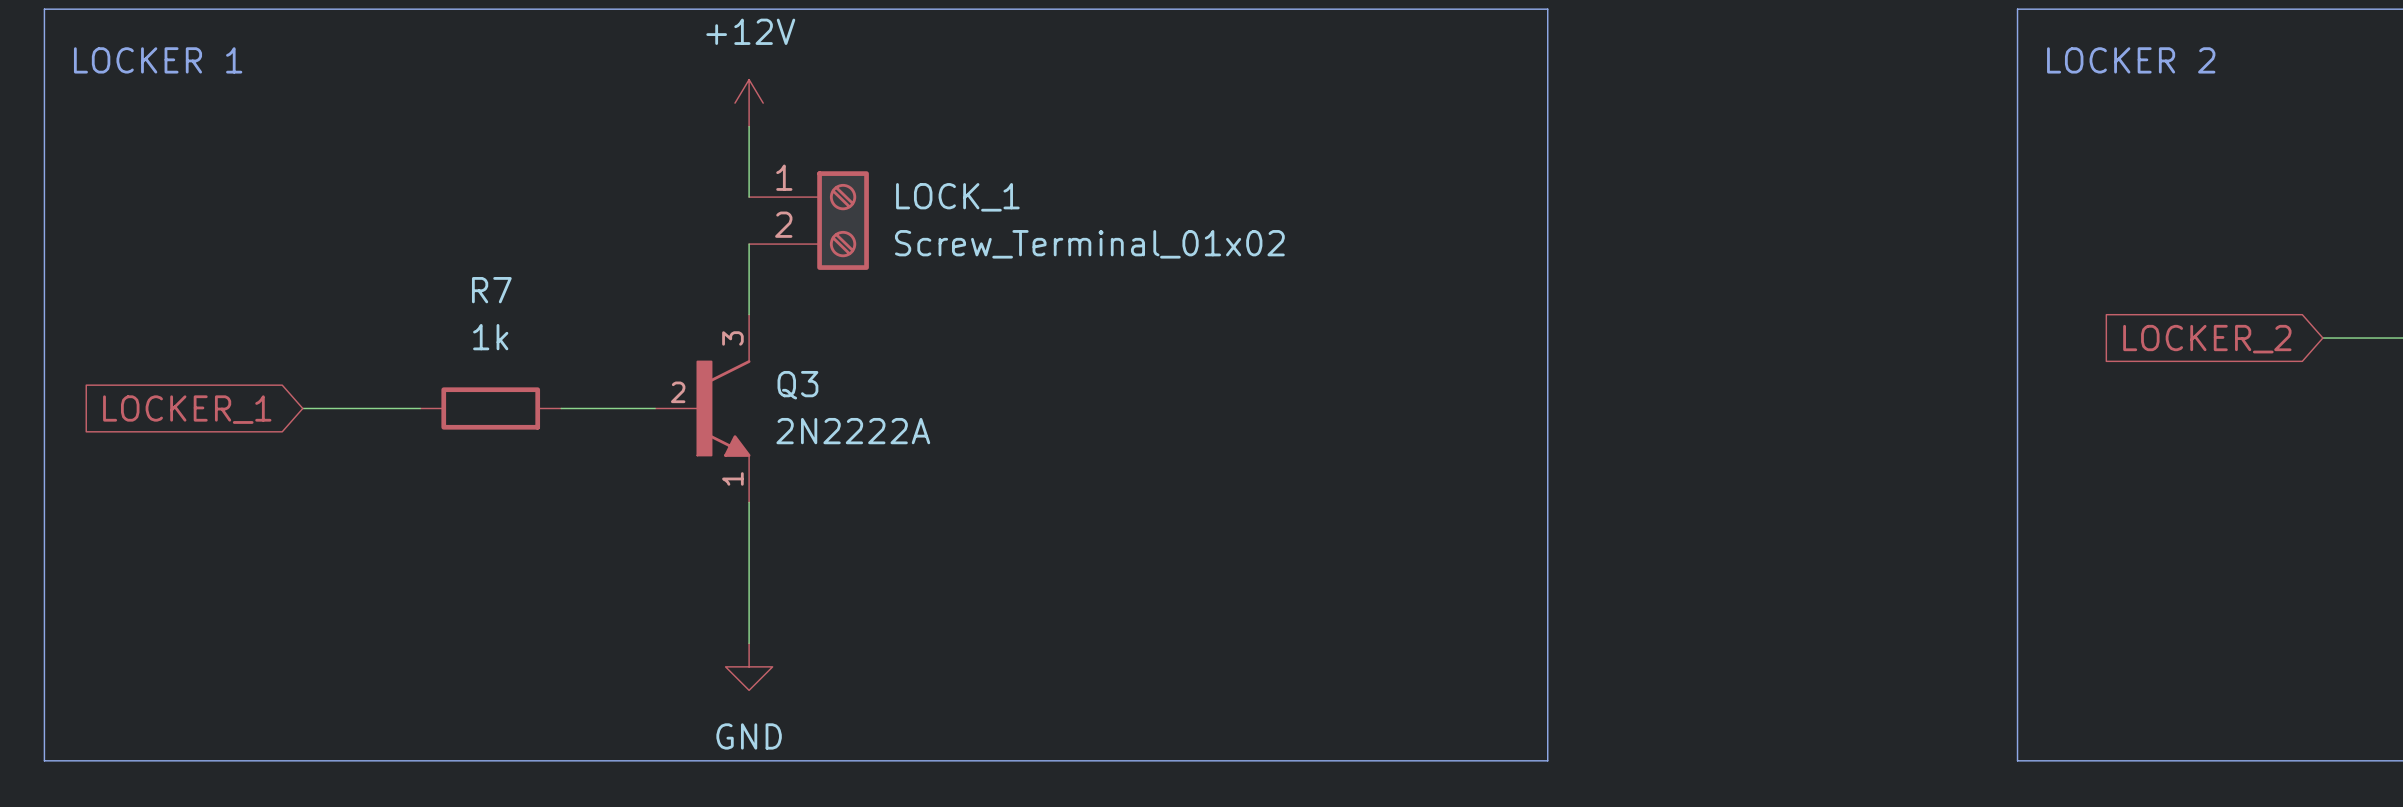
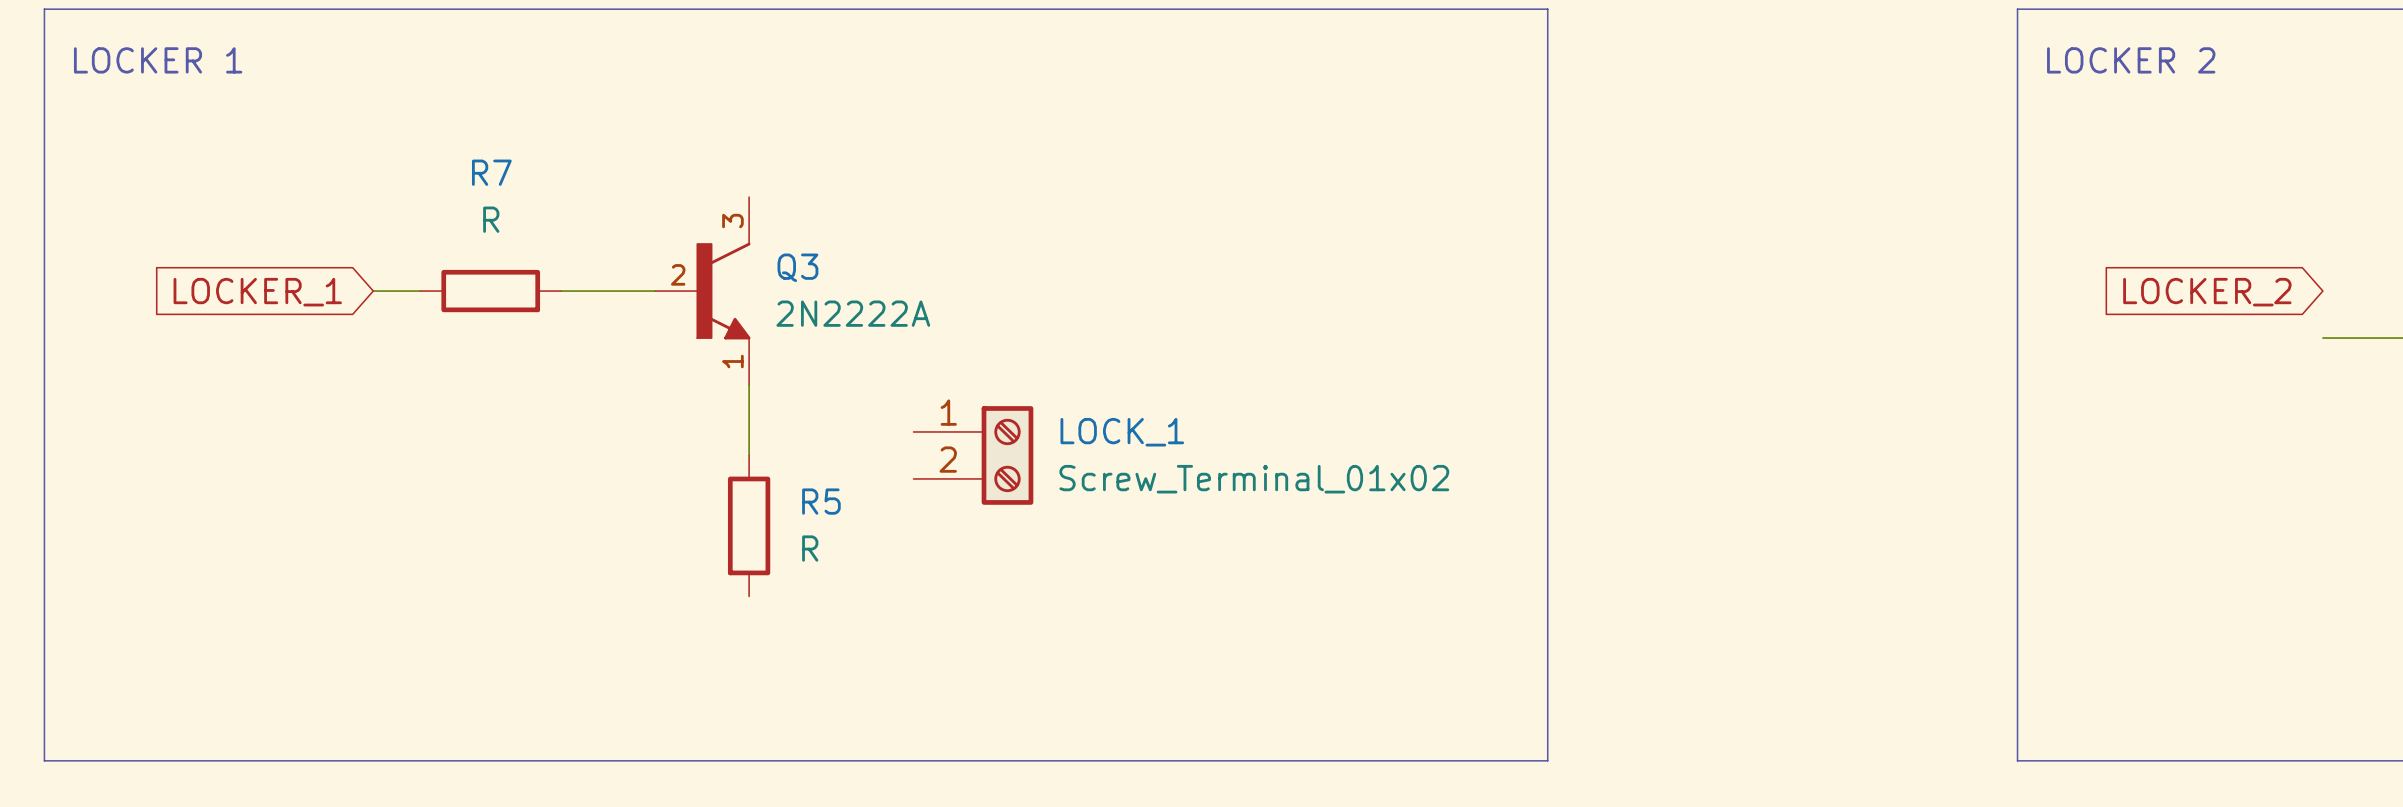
power symbol: +12V (749, 103) -> none
wire: (749, 126) (749, 197) -> none
LOCK_1 position: (809, 220) -> (973, 455)
wire: (749, 244) (749, 314) -> (749, 385) (749, 455)
wire: none -> (373, 291) (420, 291)
R7 value: 1k (490, 337) -> R (491, 219)
global label position: LOCKER_2 (2207, 339) -> LOCKER_2 (2207, 292)
wire: (302, 408) (420, 408) -> none
R7 position: (490, 408) -> (490, 291)
wire: (561, 408) (655, 408) -> (561, 291) (655, 291)
Q3 position: (702, 408) -> (702, 291)
global label position: LOCKER_1 (187, 409) -> LOCKER_1 (257, 292)
wire: (749, 502) (749, 643) -> none
R5: none -> R (749, 525)
power symbol: GND (749, 666) -> none

